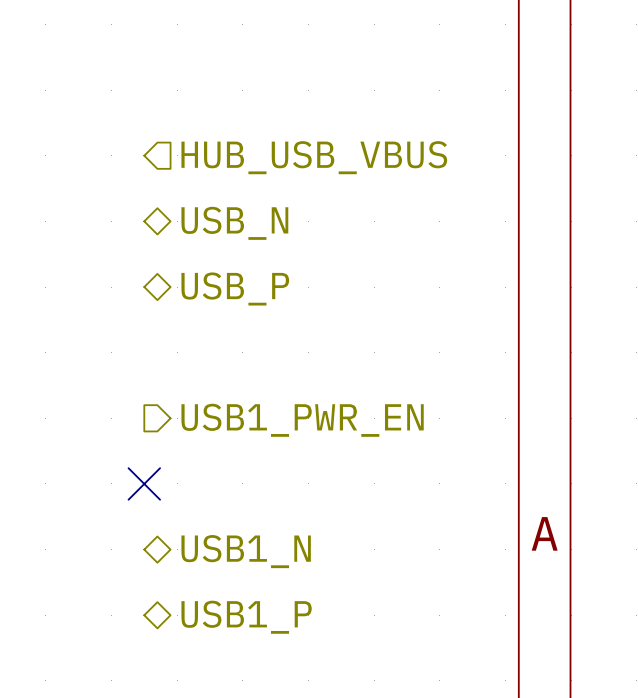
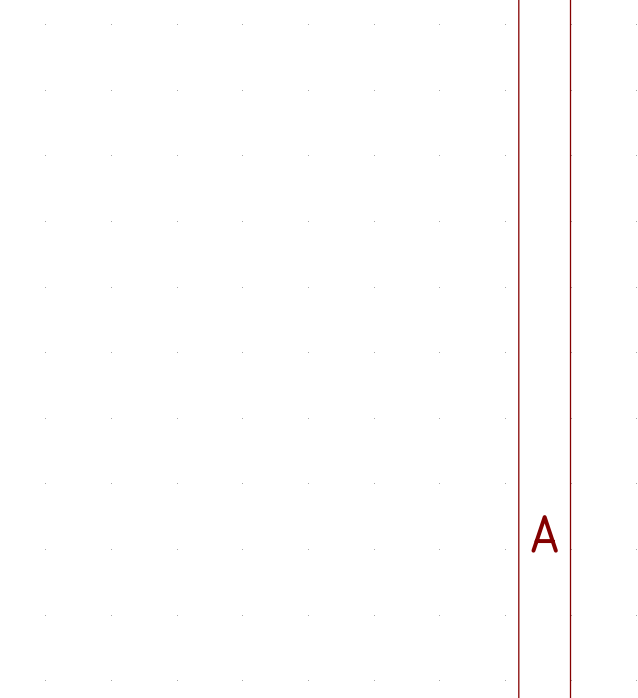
hierarchical label: HUB_USB_VBUS (314, 157) -> none
hierarchical label: USB_N (234, 223) -> none
hierarchical label: USB_P (235, 288) -> none
hierarchical label: USB1_PWR_EN (302, 420) -> none
no-connect mark: (144, 483) -> none
hierarchical label: USB1_N (246, 551) -> none
hierarchical label: USB1_P (246, 617) -> none

